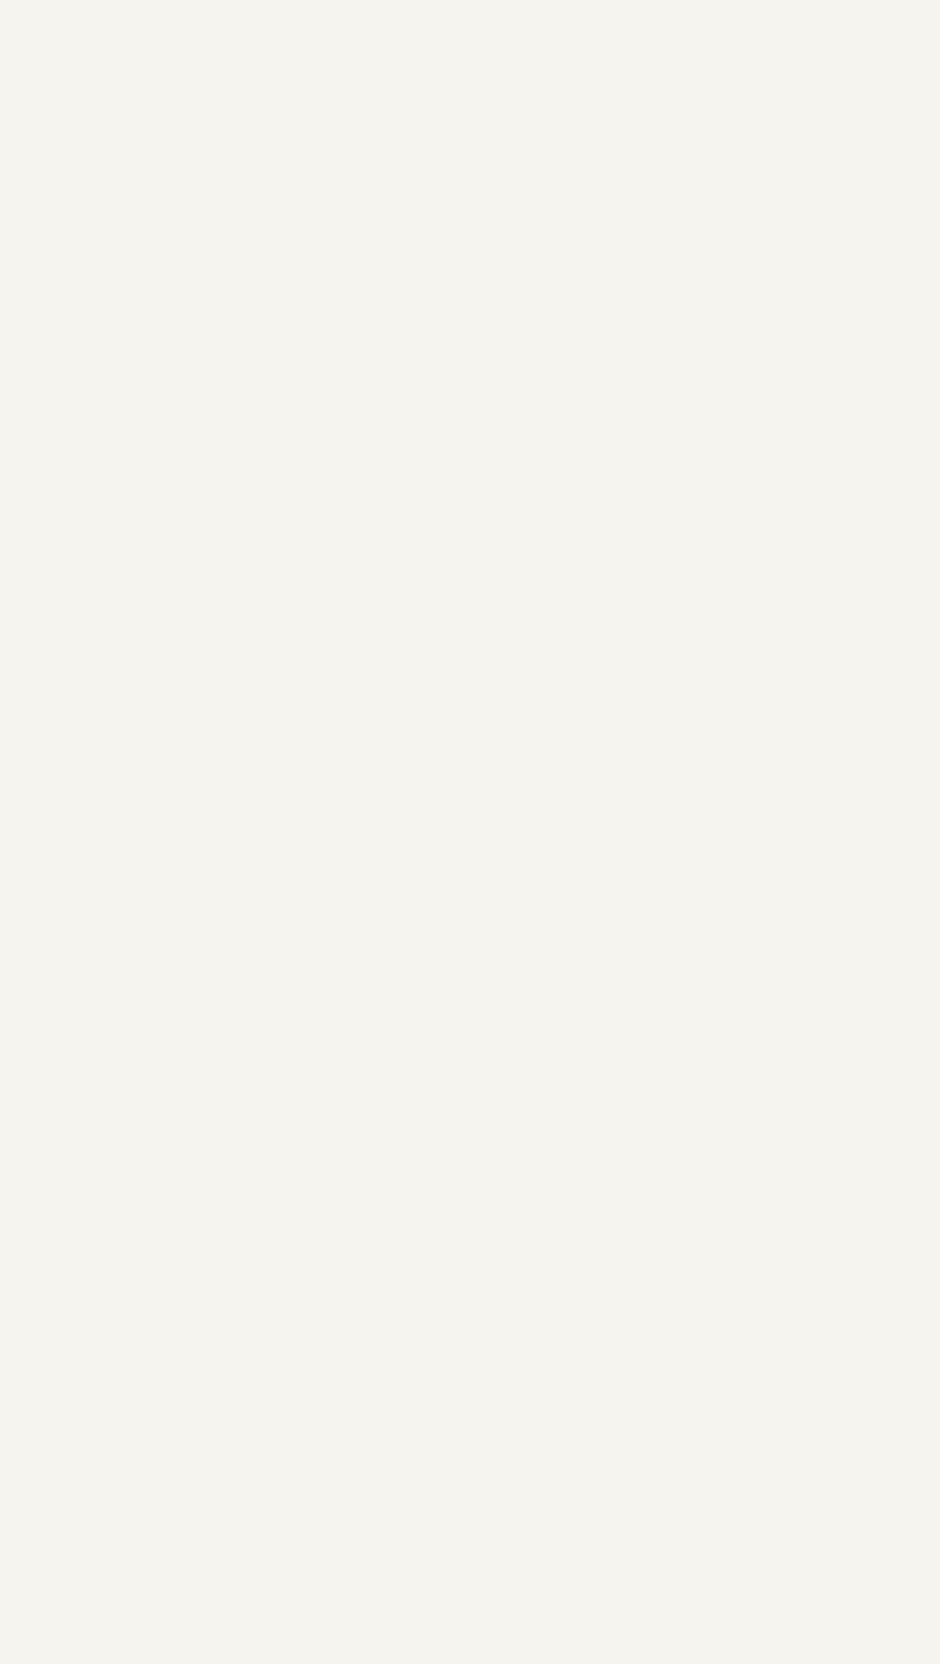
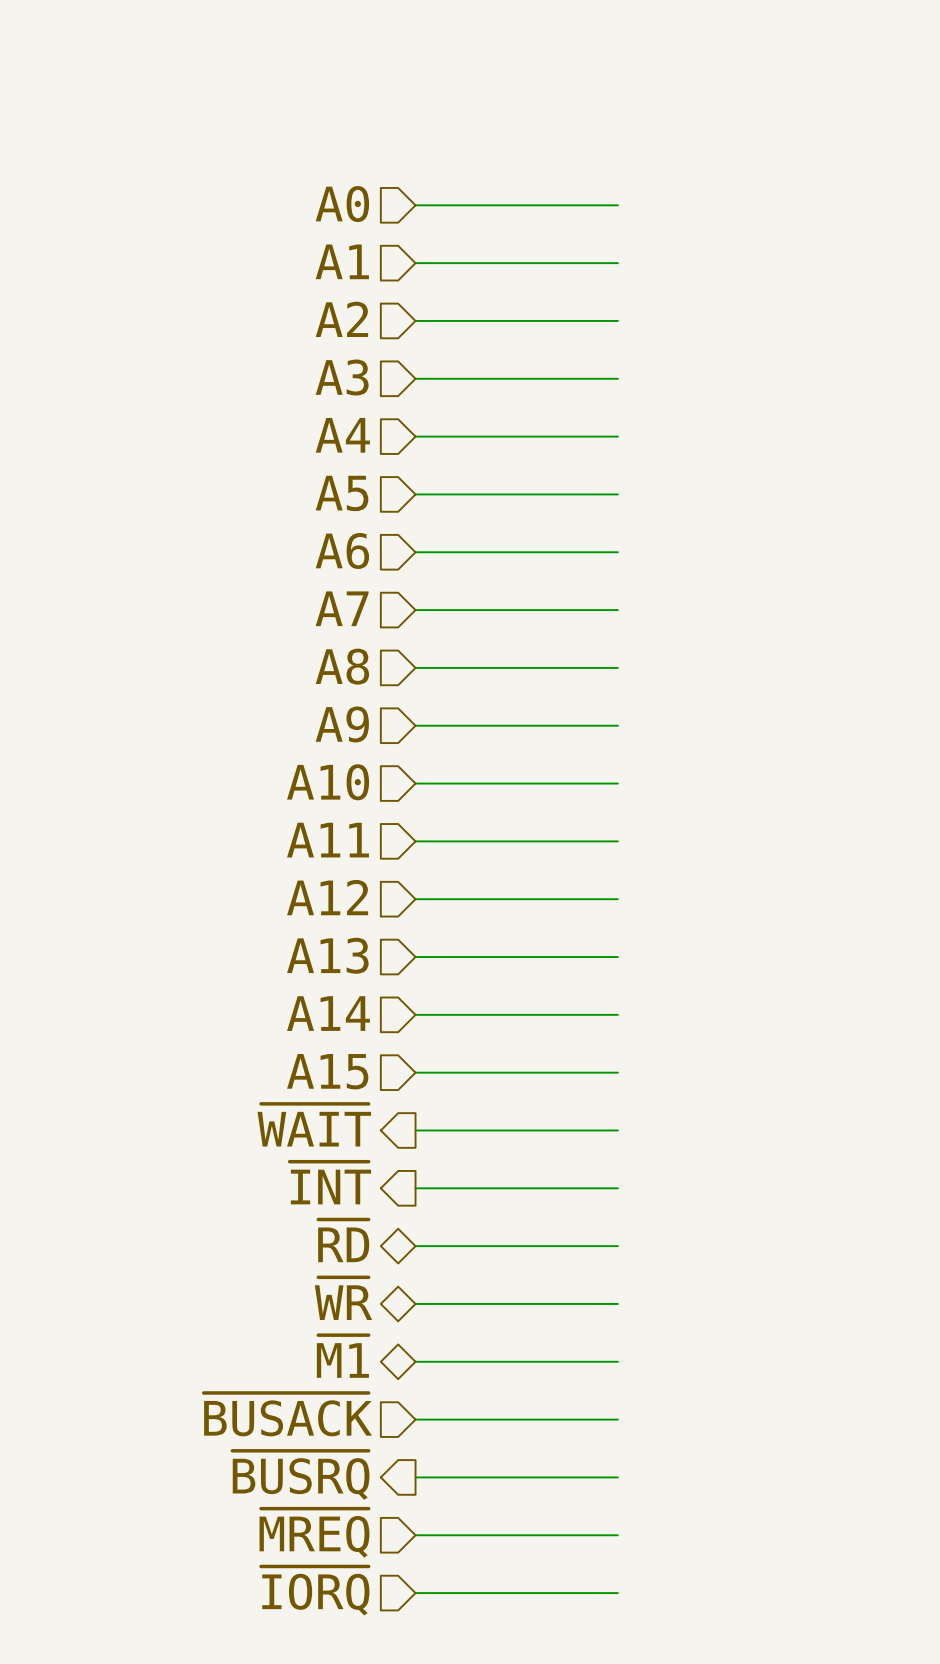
hierarchical label: none -> A0 (342, 204)
wire: none -> (415, 205) (617, 205)
hierarchical label: none -> A1 (342, 261)
wire: none -> (415, 263) (617, 263)
hierarchical label: none -> A2 (341, 319)
wire: none -> (415, 320) (617, 320)
hierarchical label: none -> A3 (342, 377)
wire: none -> (415, 378) (617, 378)
hierarchical label: none -> A4 (342, 435)
wire: none -> (415, 436) (617, 436)
hierarchical label: none -> A5 (342, 493)
wire: none -> (415, 494) (617, 494)
hierarchical label: none -> A6 (342, 550)
wire: none -> (415, 552) (617, 552)
hierarchical label: none -> A7 (342, 608)
wire: none -> (415, 610) (617, 610)
hierarchical label: none -> A8 (342, 666)
wire: none -> (415, 667) (617, 667)
hierarchical label: none -> A9 (342, 724)
wire: none -> (415, 725) (617, 725)
hierarchical label: none -> A10 (328, 782)
wire: none -> (415, 783) (617, 783)
hierarchical label: none -> A11 (328, 840)
wire: none -> (415, 841) (617, 841)
hierarchical label: none -> A12 (327, 897)
wire: none -> (415, 899) (617, 899)
hierarchical label: none -> A13 (327, 955)
wire: none -> (415, 957) (617, 957)
hierarchical label: none -> A14 (328, 1013)
wire: none -> (415, 1014) (617, 1014)
hierarchical label: none -> A15 (327, 1071)
wire: none -> (415, 1072) (617, 1072)
hierarchical label: none -> ~{WAIT} (314, 1125)
wire: none -> (415, 1130) (617, 1130)
hierarchical label: none -> ~{INT} (330, 1183)
wire: none -> (415, 1188) (617, 1188)
hierarchical label: none -> ~{RD} (343, 1240)
wire: none -> (415, 1246) (617, 1246)
hierarchical label: none -> ~{WR} (343, 1298)
wire: none -> (415, 1303) (617, 1303)
hierarchical label: none -> ~{M1} (342, 1356)
wire: none -> (415, 1361) (617, 1361)
hierarchical label: none -> ~{BUSACK} (287, 1414)
wire: none -> (415, 1419) (617, 1419)
hierarchical label: none -> ~{BUSRQ} (300, 1475)
wire: none -> (415, 1477) (617, 1477)
hierarchical label: none -> ~{MREQ} (314, 1533)
wire: none -> (415, 1535) (617, 1535)
hierarchical label: none -> ~{IORQ} (315, 1590)
wire: none -> (415, 1593) (617, 1593)

